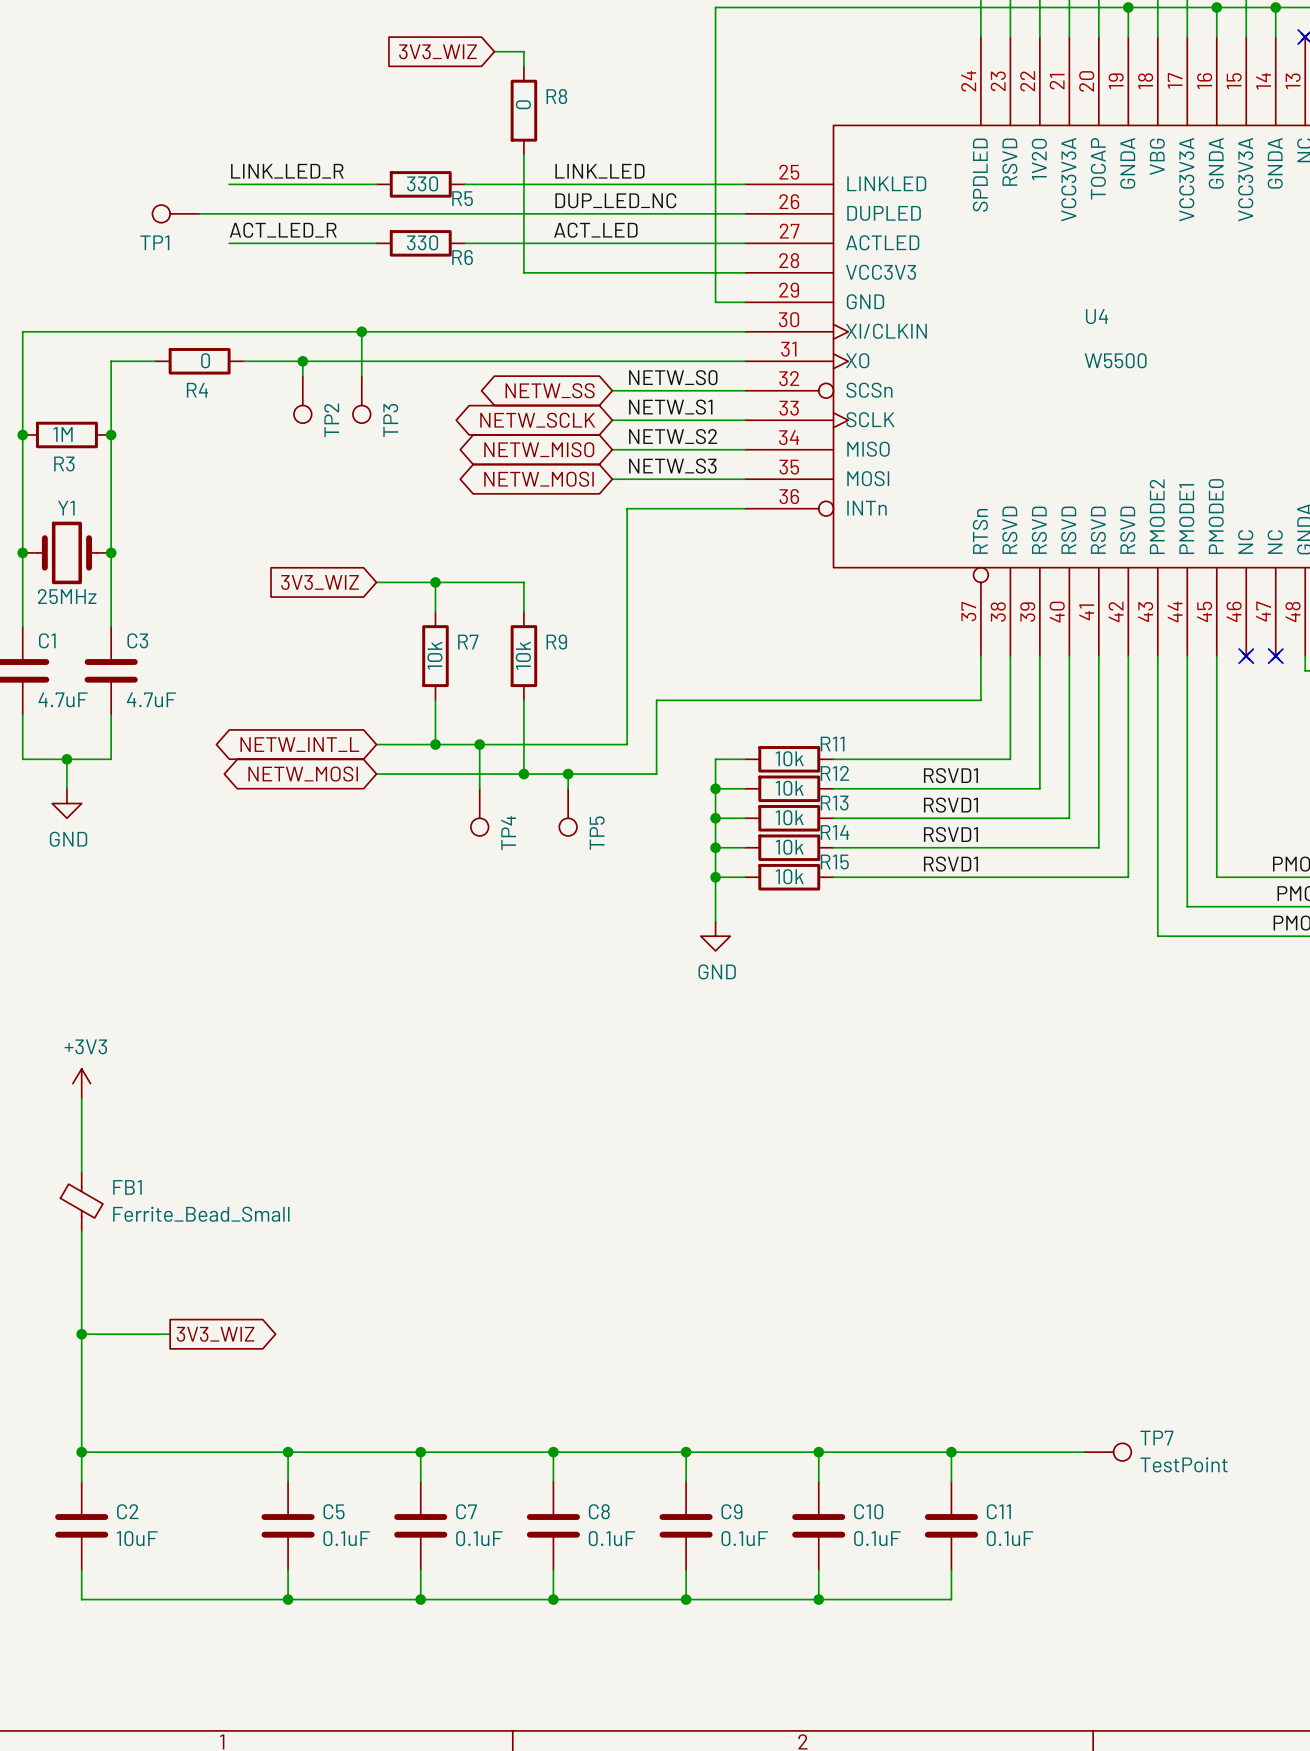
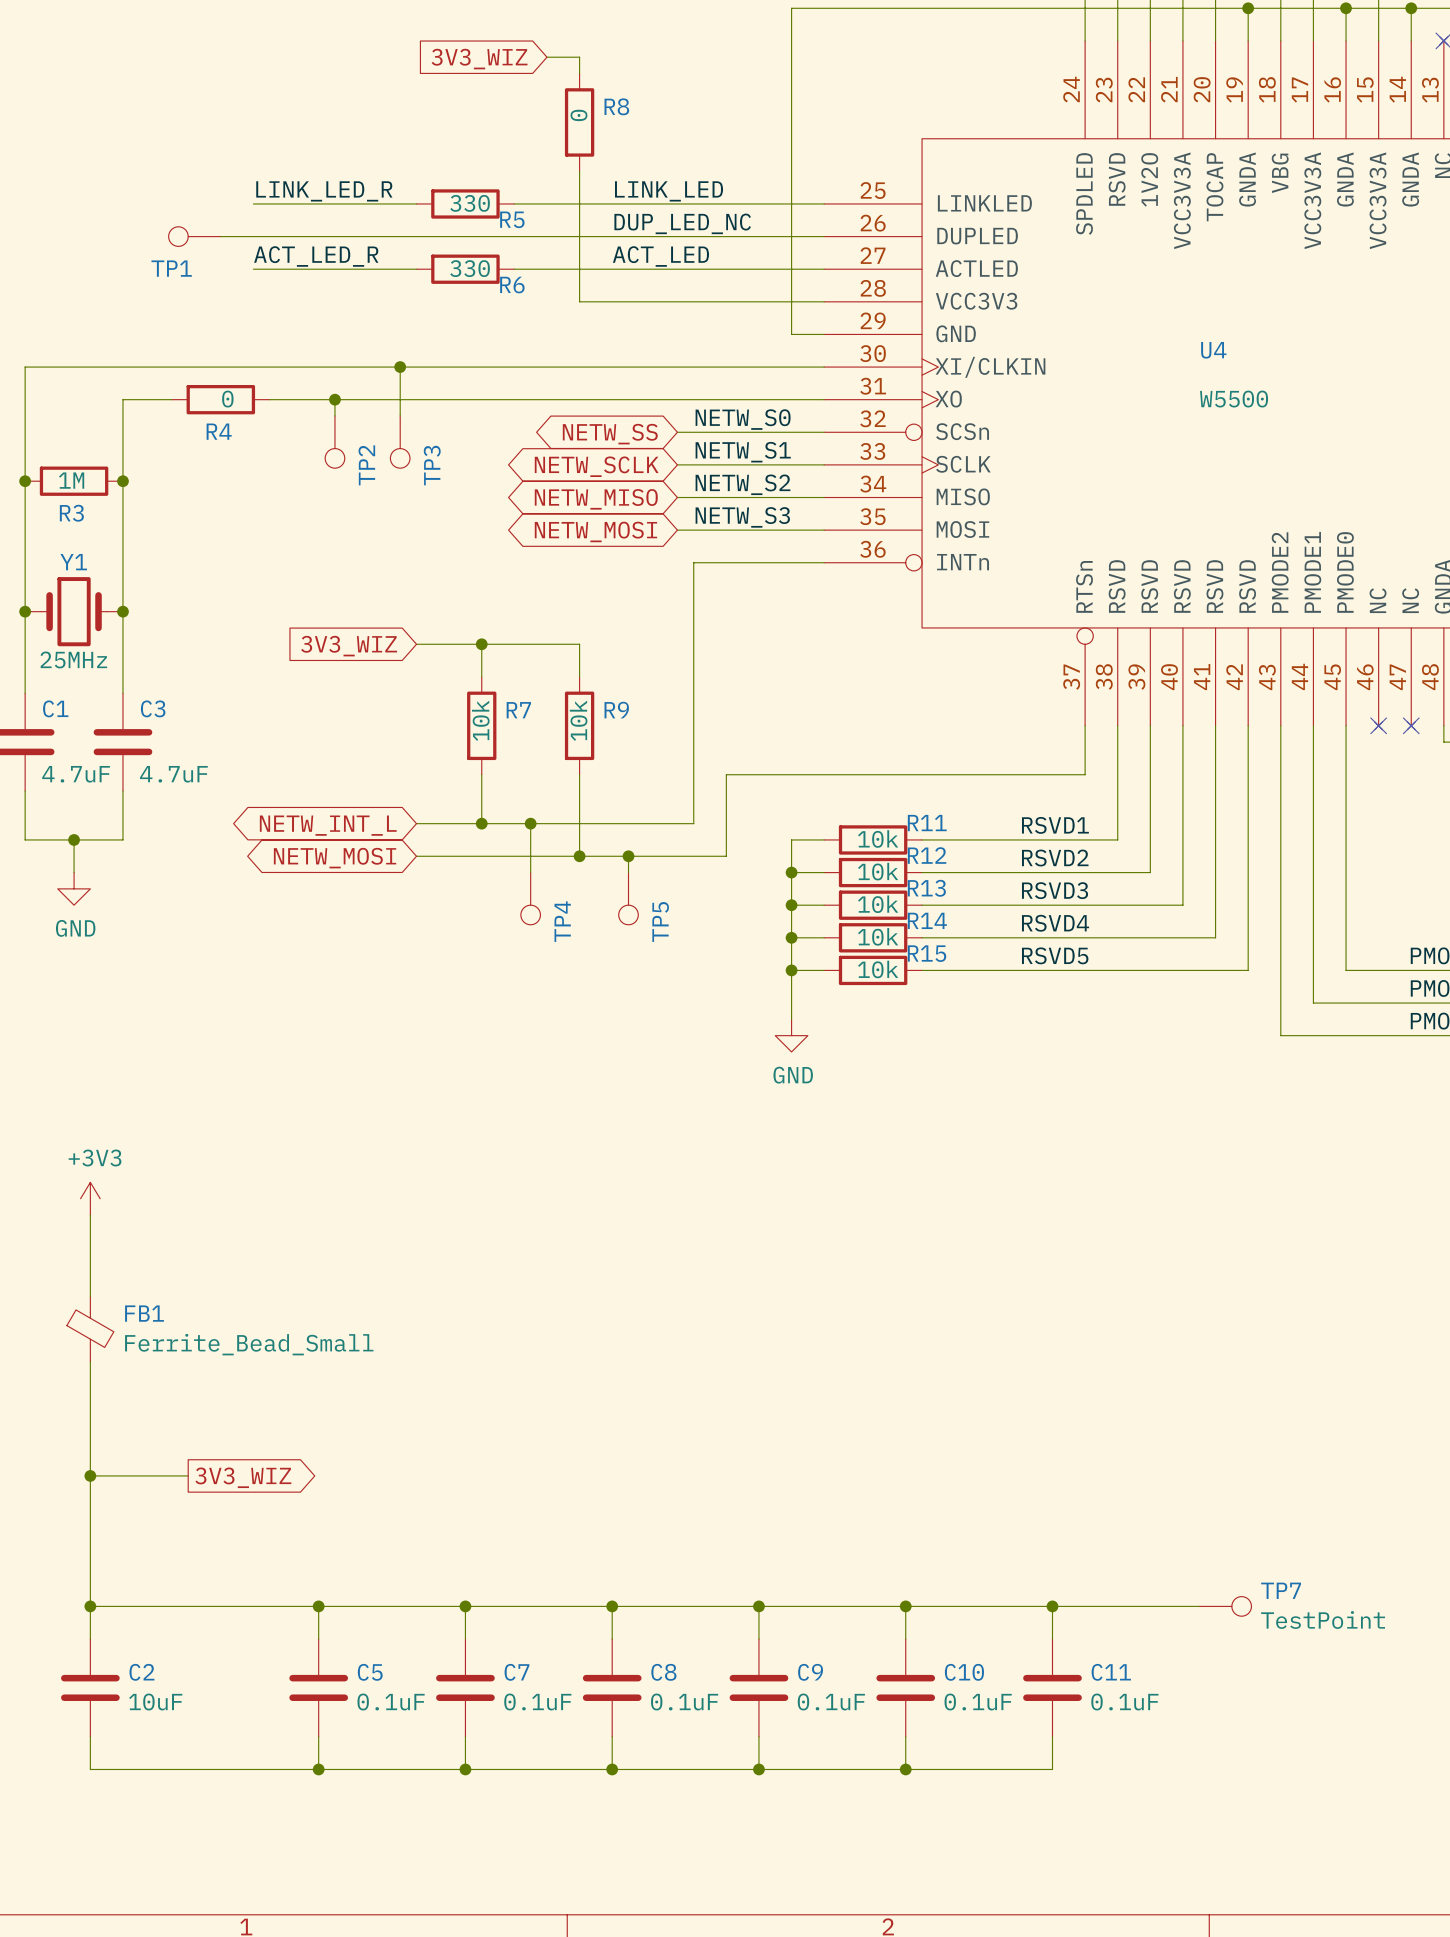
label: none -> RSVD1 (1055, 825)
label: RSVD1 (950, 775) -> RSVD2 (1055, 858)
label: RSVD1 (950, 805) -> RSVD3 (1055, 890)
label: RSVD1 (950, 834) -> RSVD4 (1055, 923)
label: RSVD1 (950, 864) -> RSVD5 (1055, 955)

